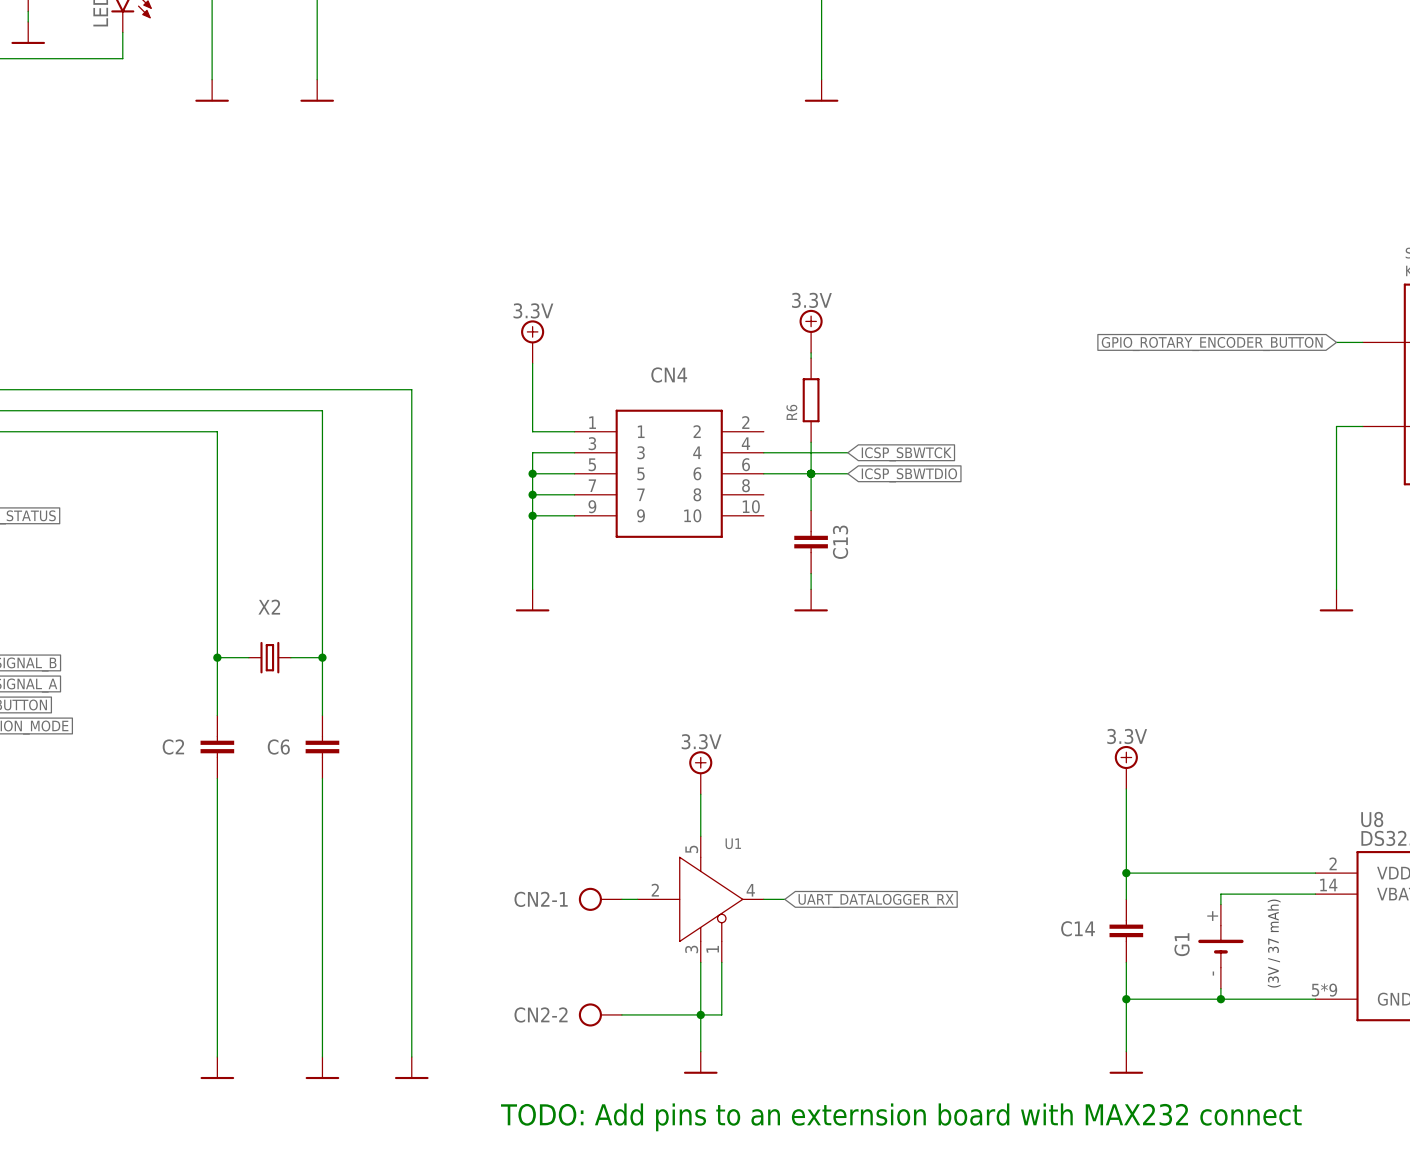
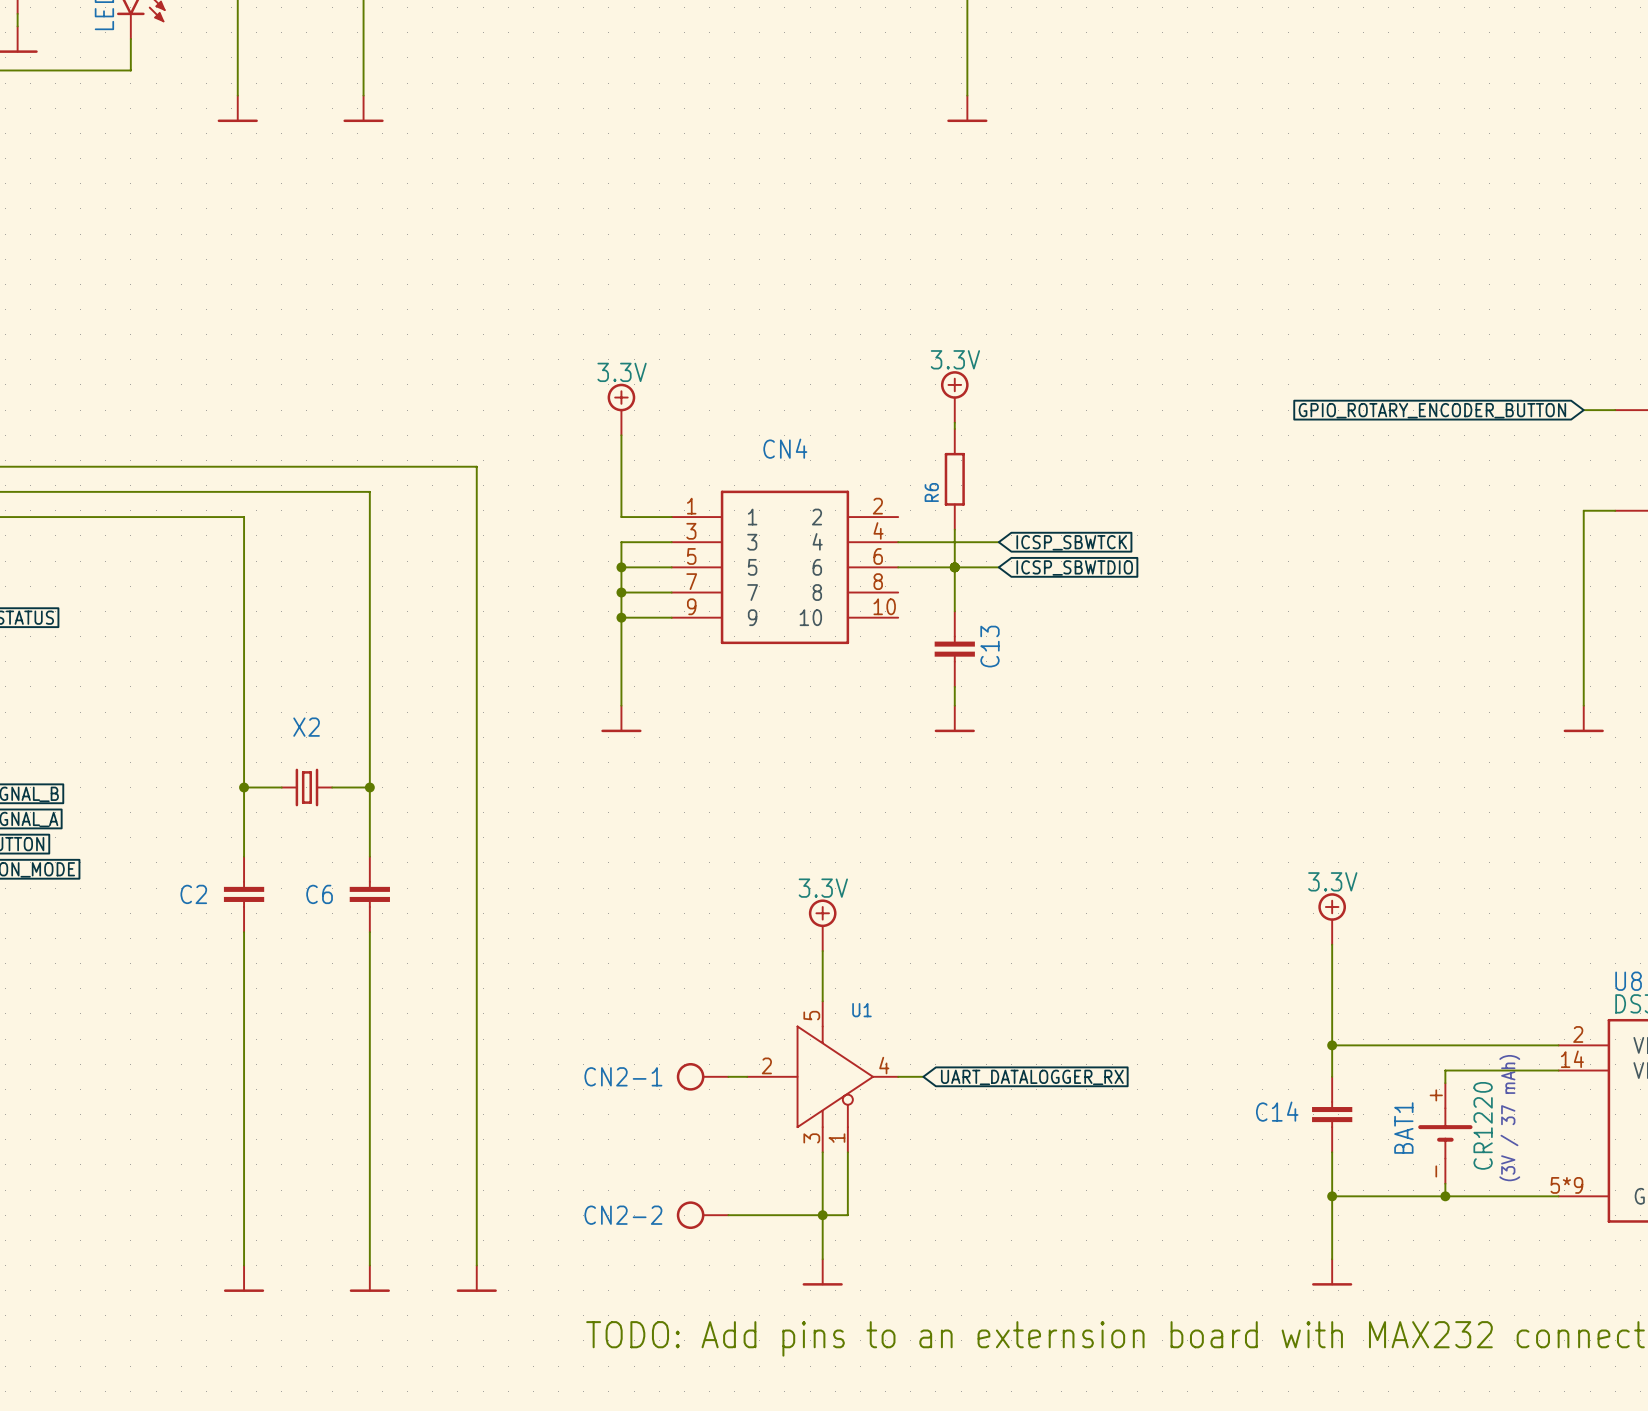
G1 value: none -> CR1220 (1483, 1125)
G1 name: G1 (1182, 944) -> BAT1 (1403, 1128)

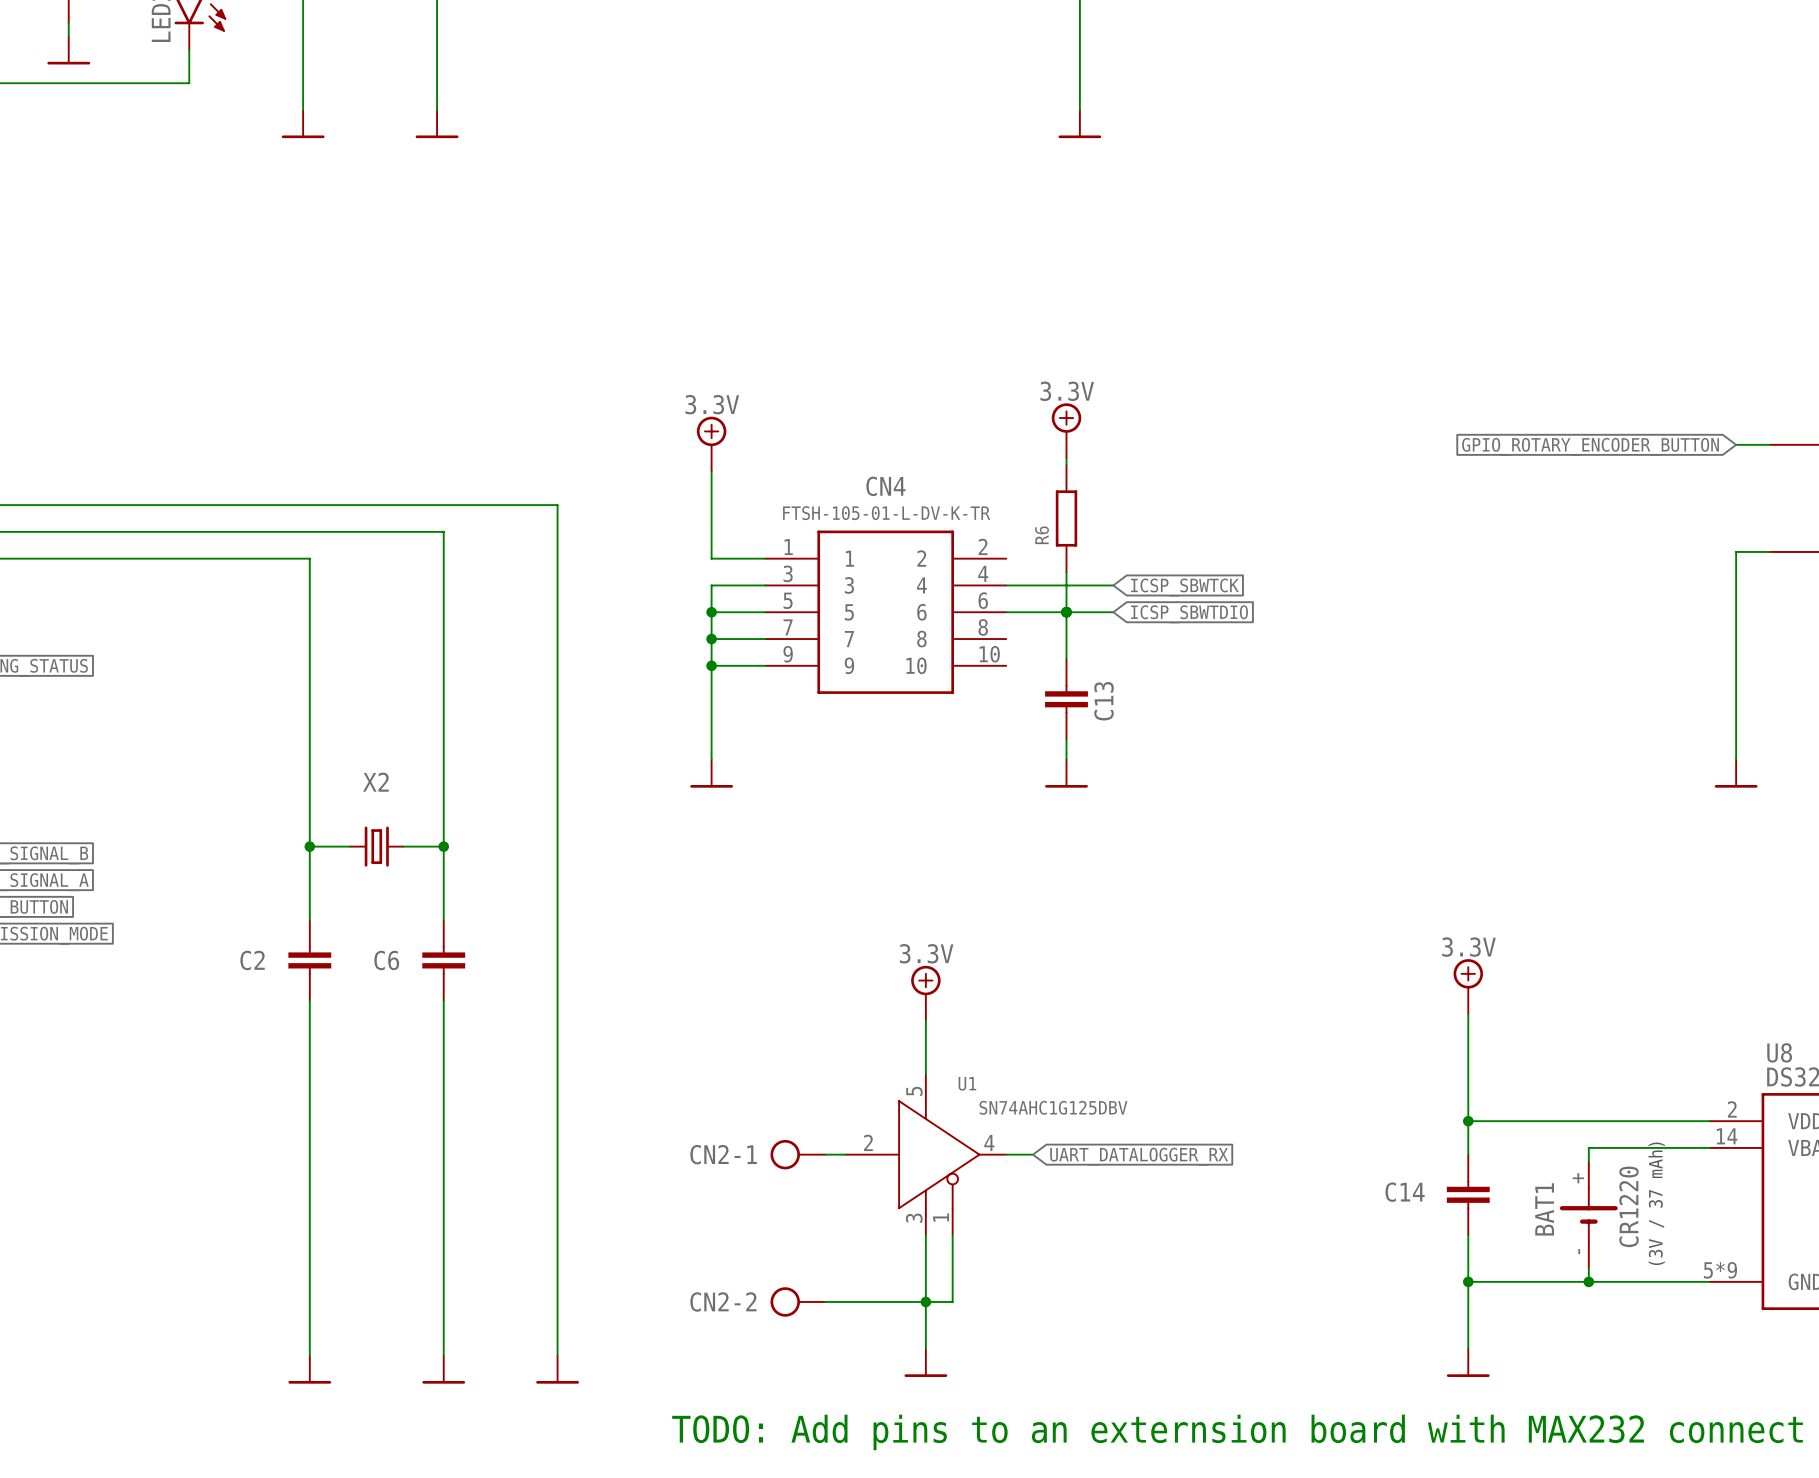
CN4 value: none -> FTSH-105-01-L-DV-K-TR (886, 513)
U1 value: none -> SN74AHC1G125DBV (1053, 1107)

